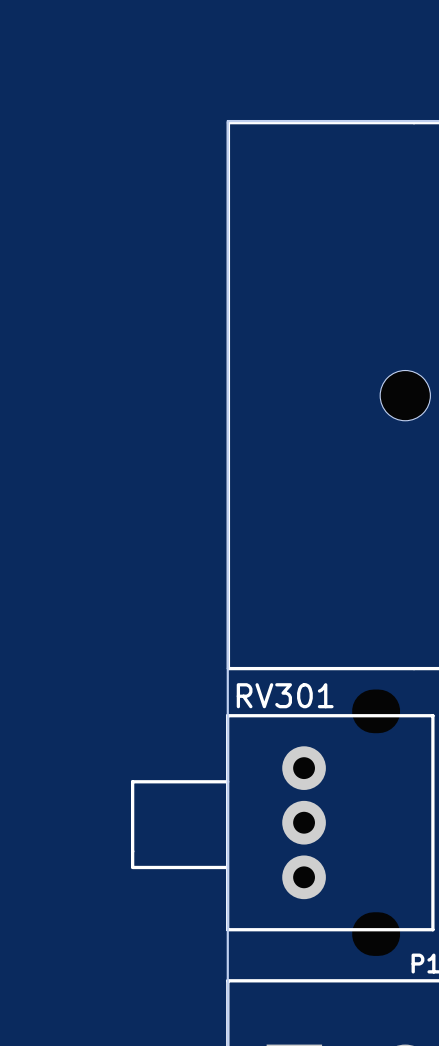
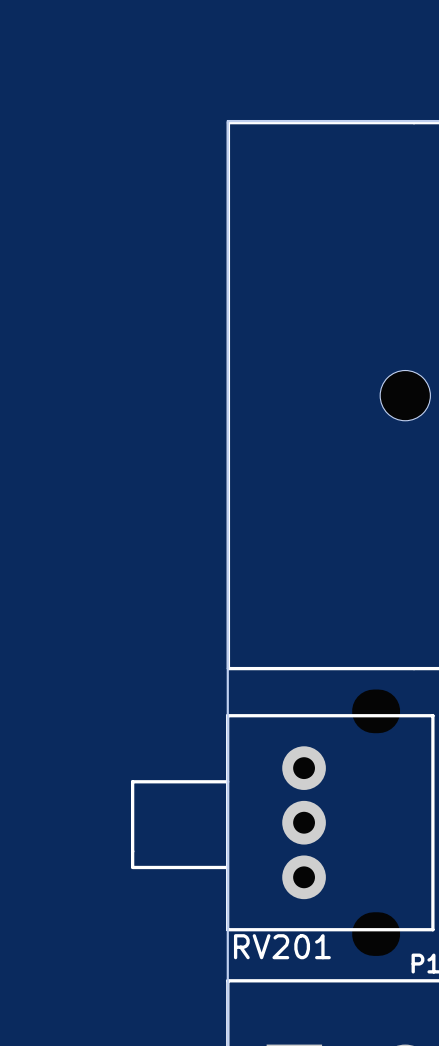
RV301 name: RV301 (285, 695) -> RV201 (282, 946)

